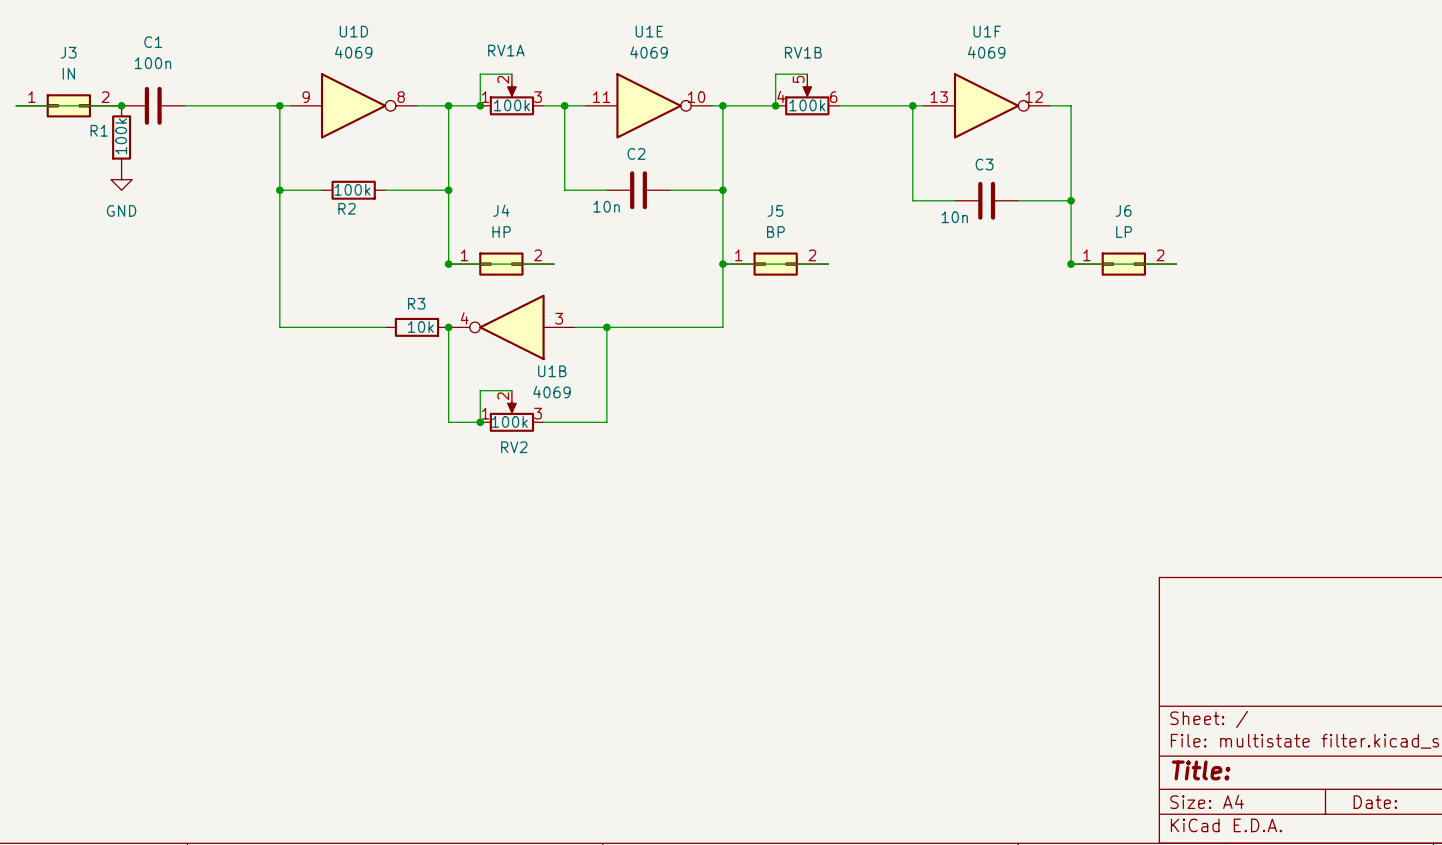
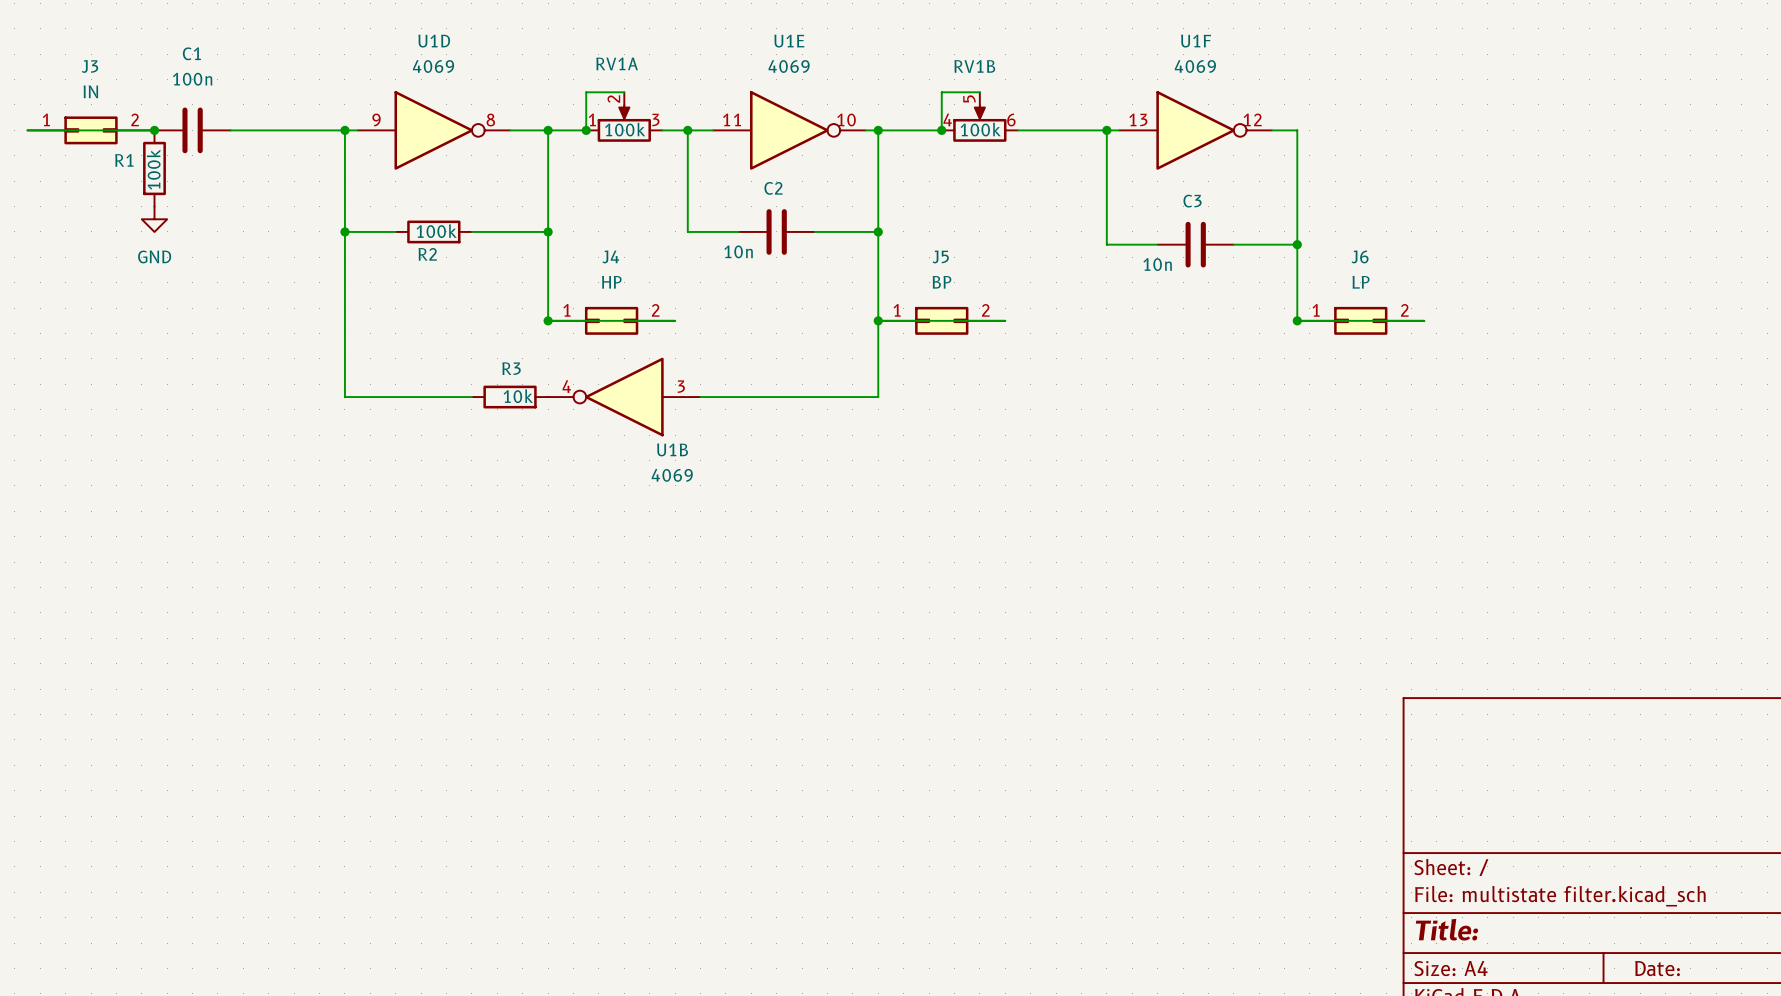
wire: (448, 327) (448, 422) (480, 422) (480, 390) (511, 390) -> none
junction: (448, 327) -> none
wire: (606, 327) (606, 422) (543, 422) -> none
junction: (606, 327) -> none
RV2: 100k (511, 411) -> none
junction: (480, 422) -> none

